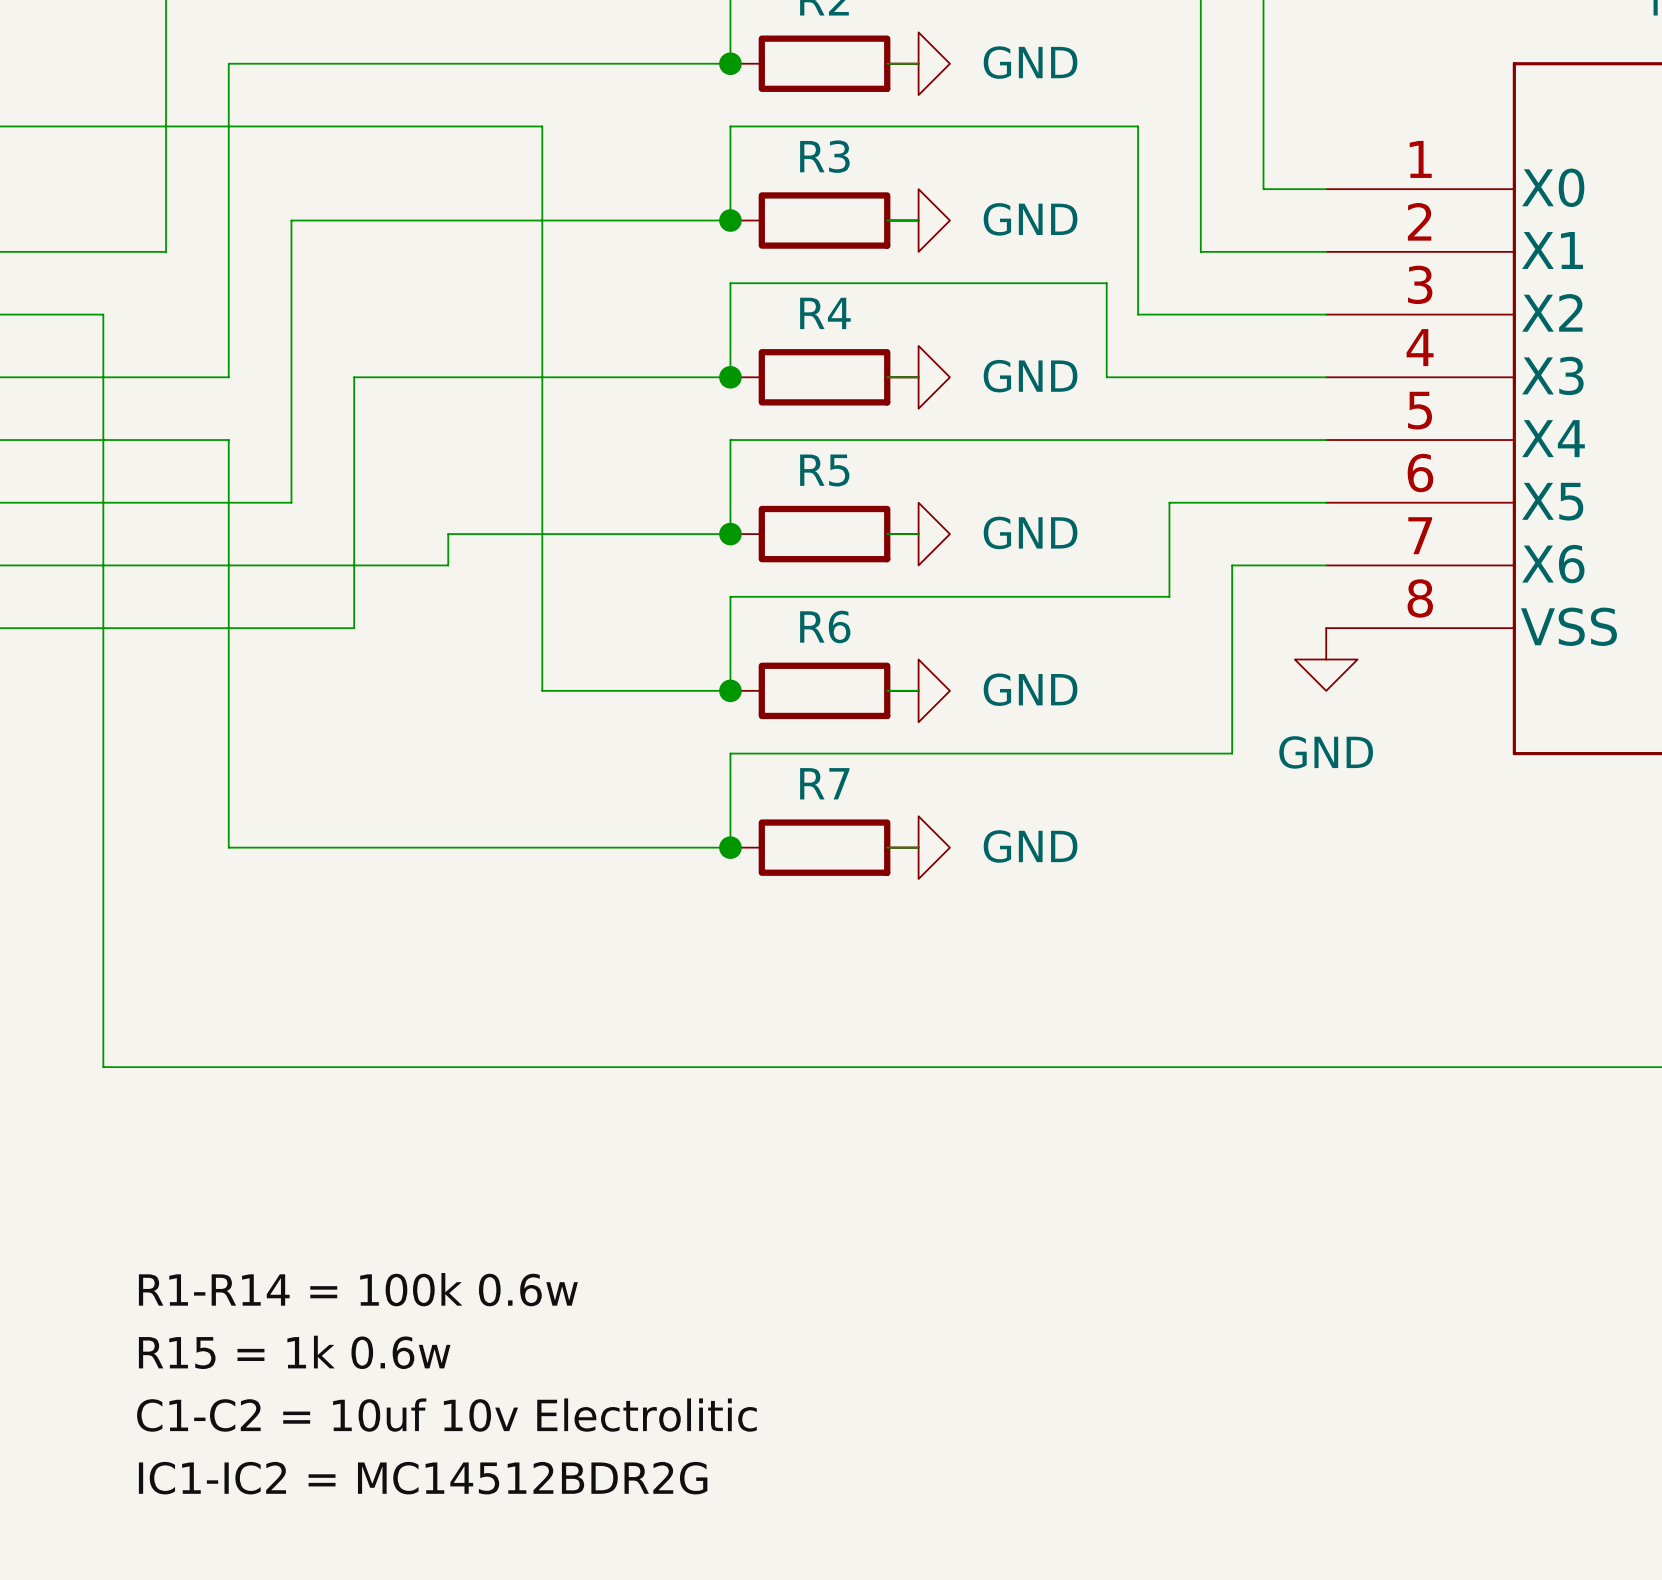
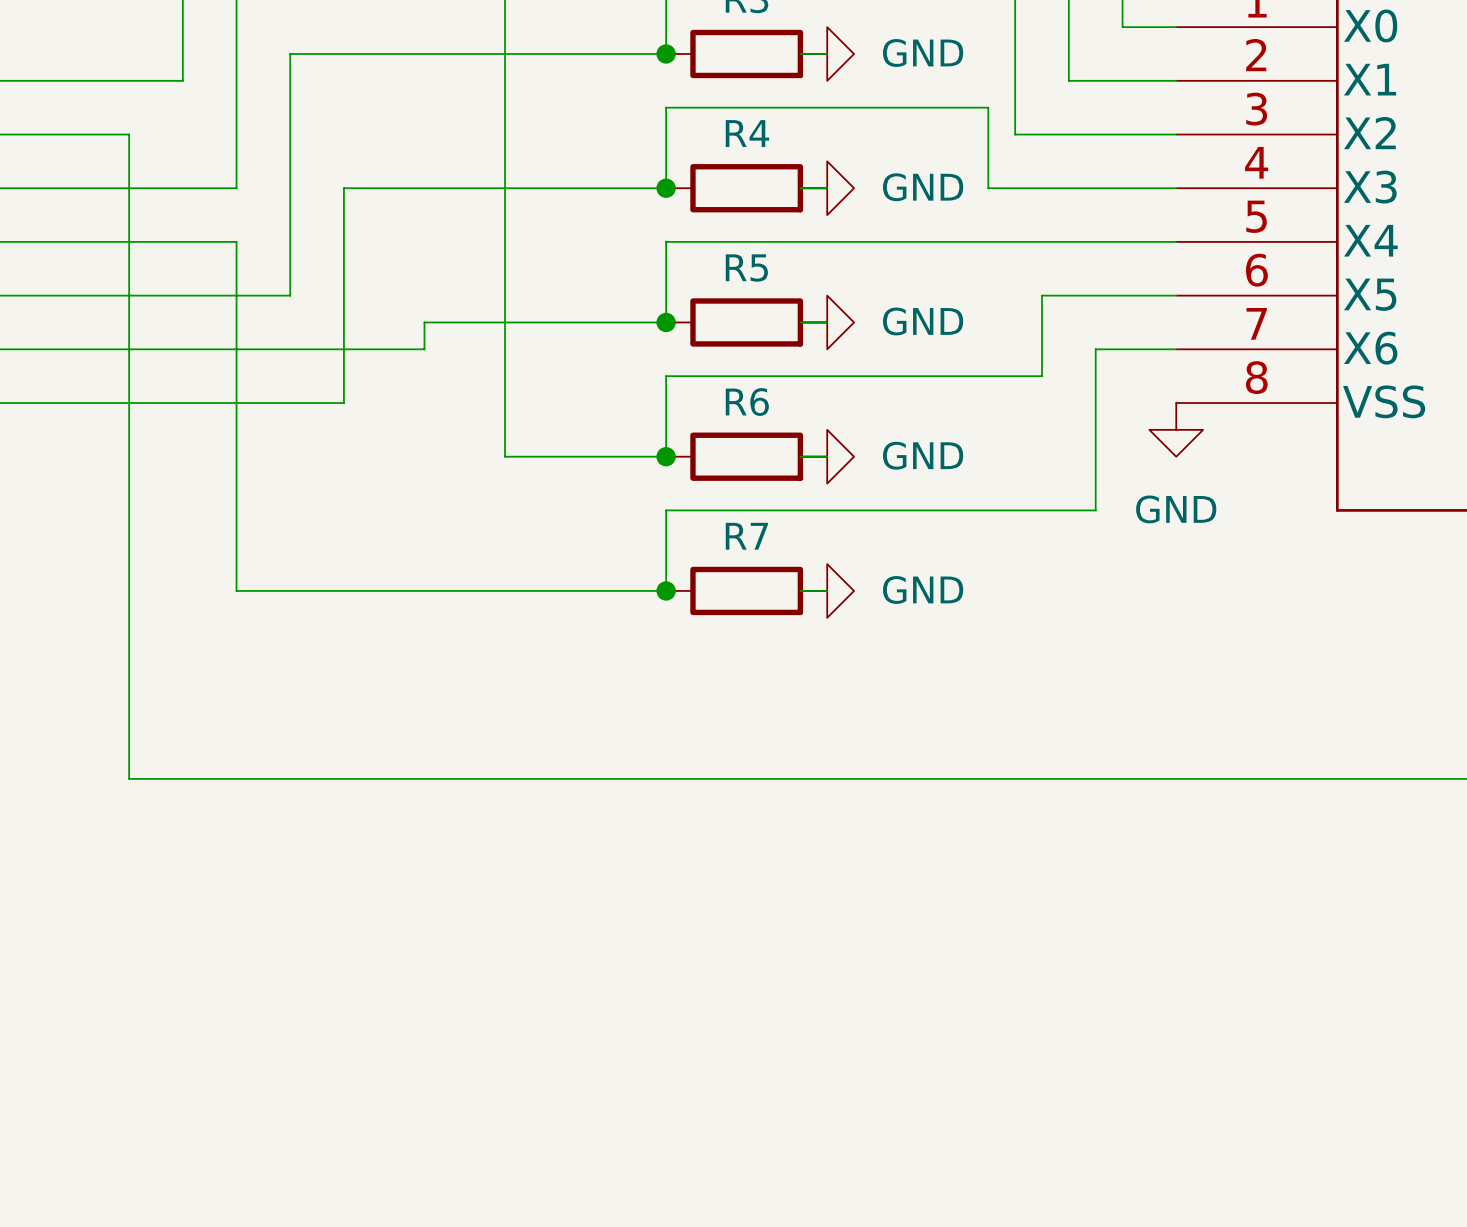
label: R1-R14 = 100k 0.6w (358, 1289) -> none
label: R15 = 1k 0.6w (294, 1352) -> none
label: C1-C2 = 10uf 10v Electrolitic (446, 1415) -> none
label: IC1-IC2 = MC14512BDR2G (423, 1478) -> none

